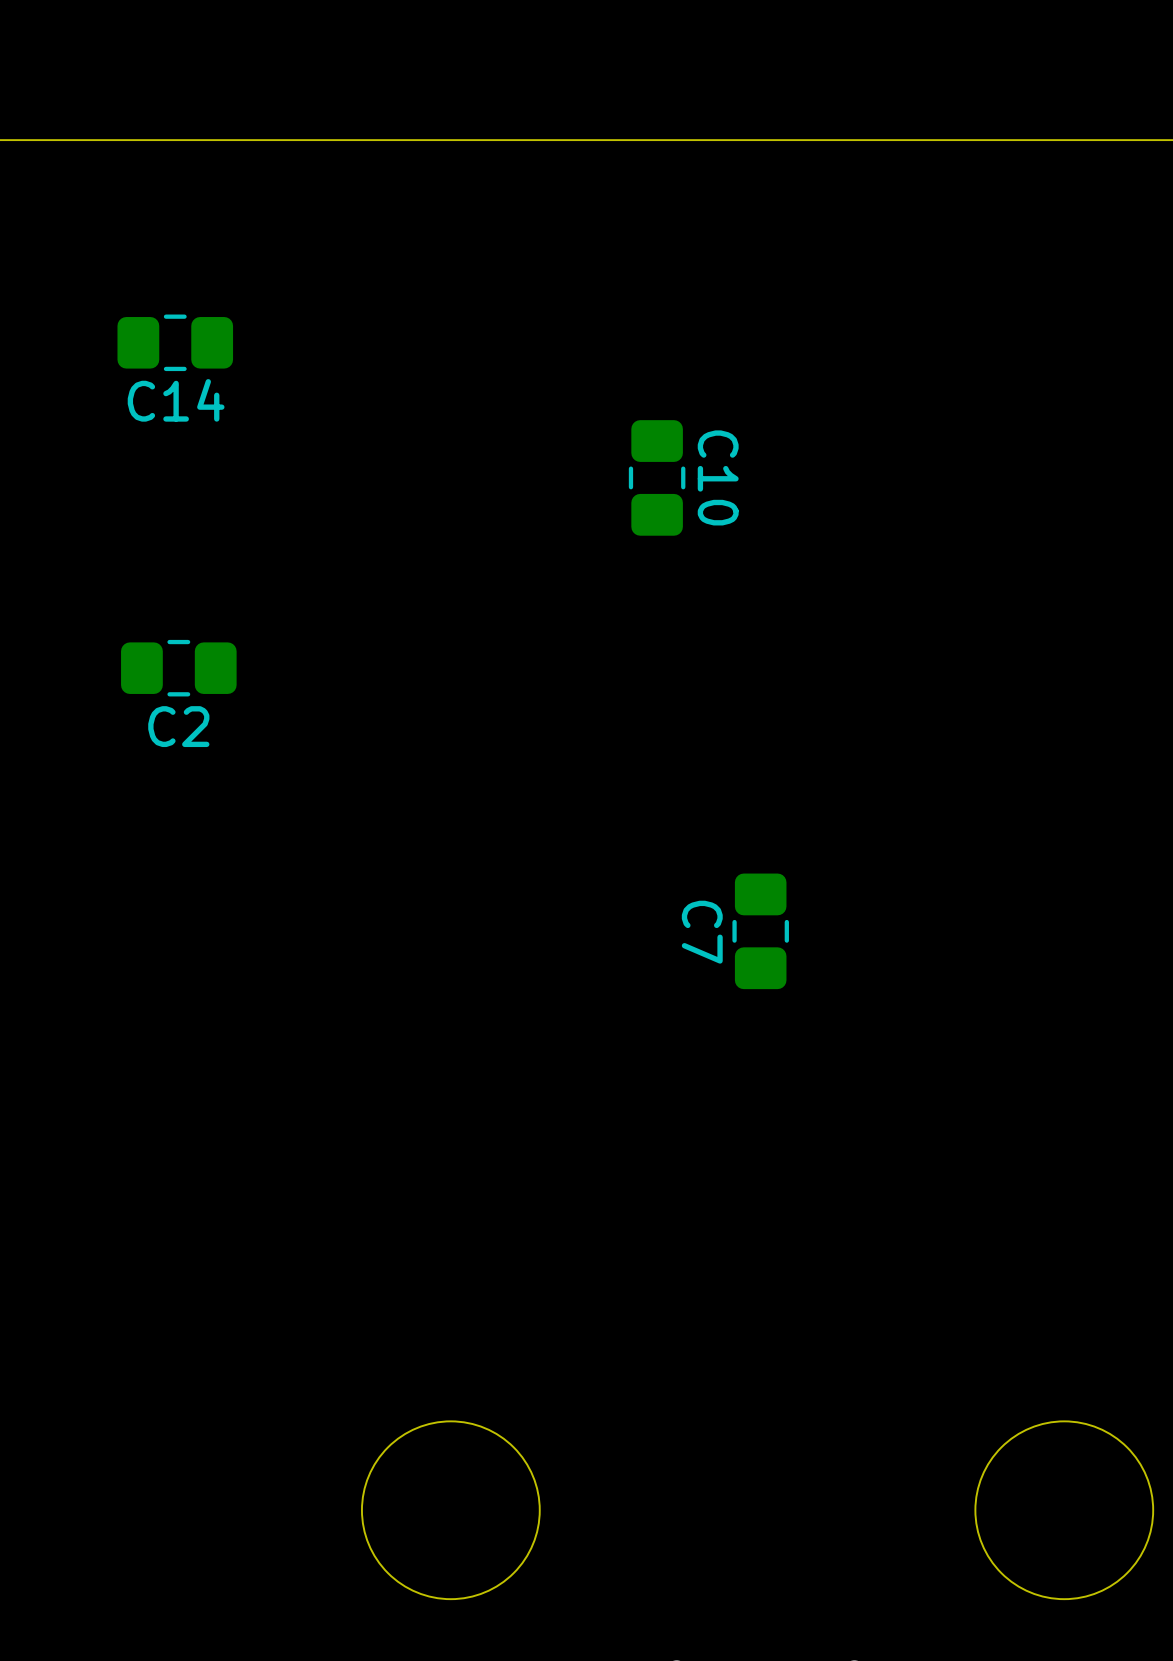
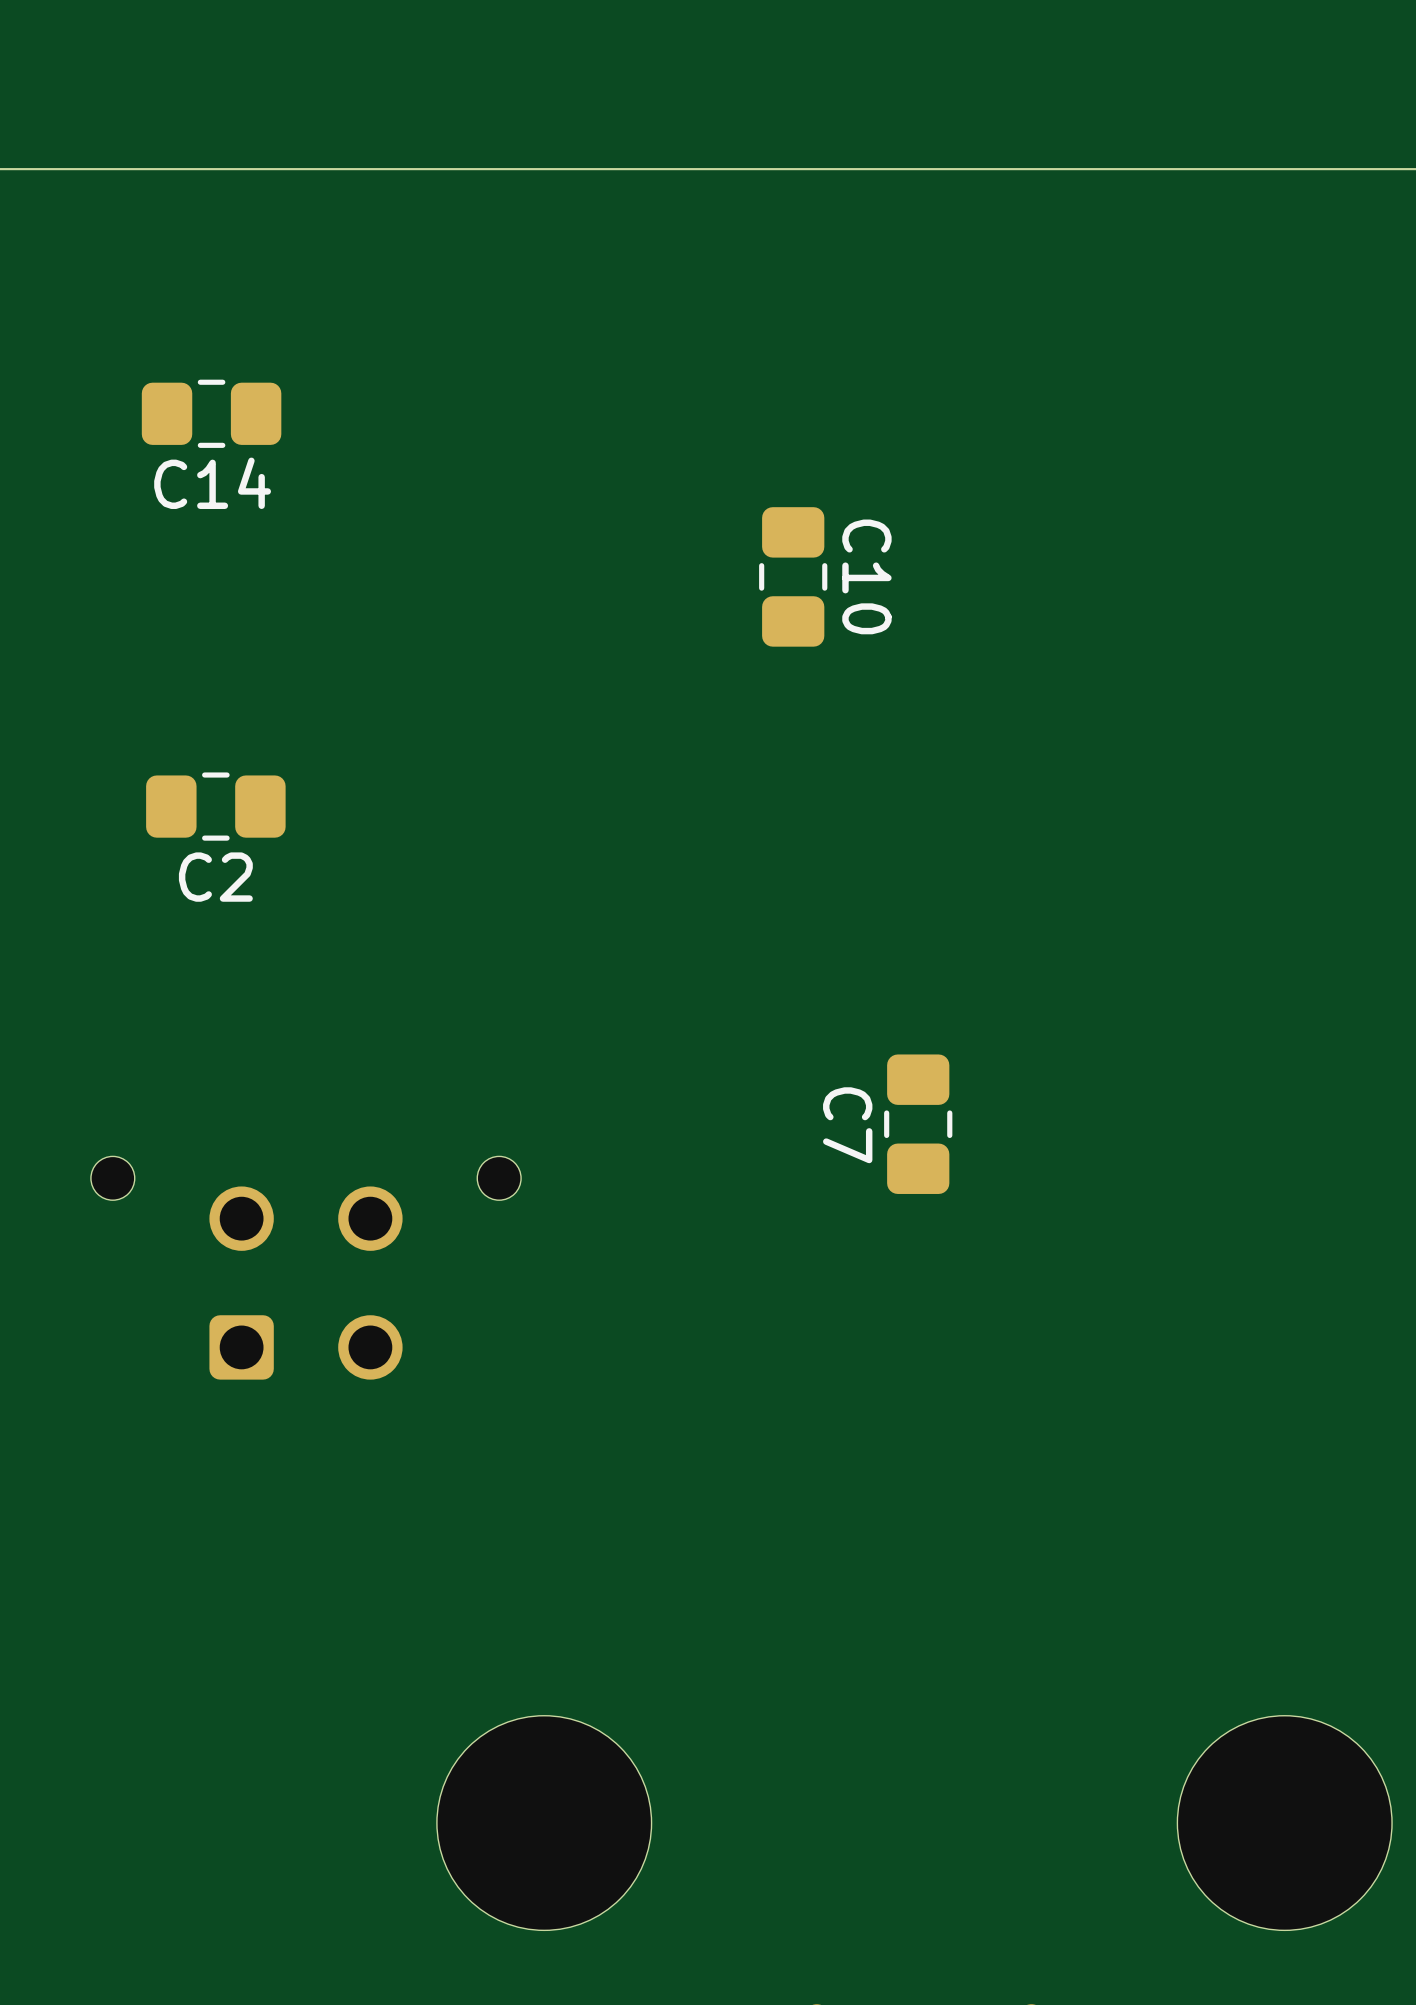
part: none -> (306, 1268)

